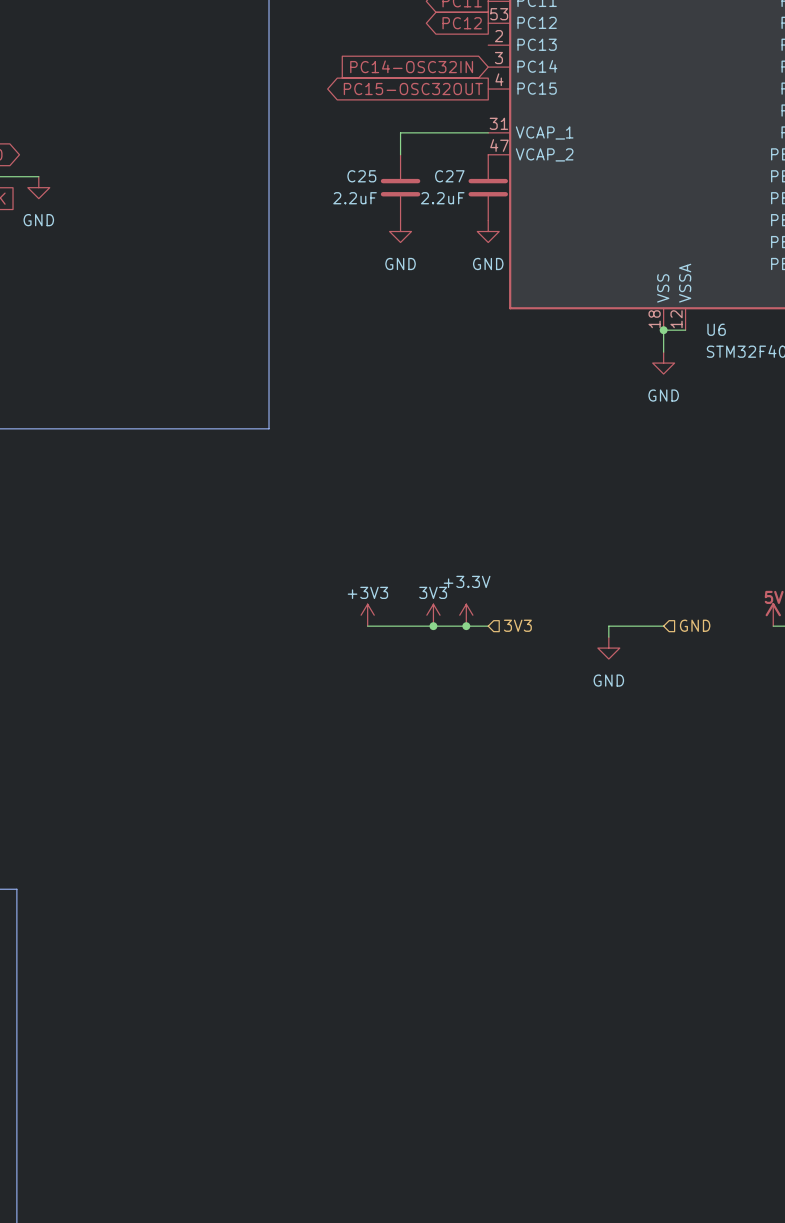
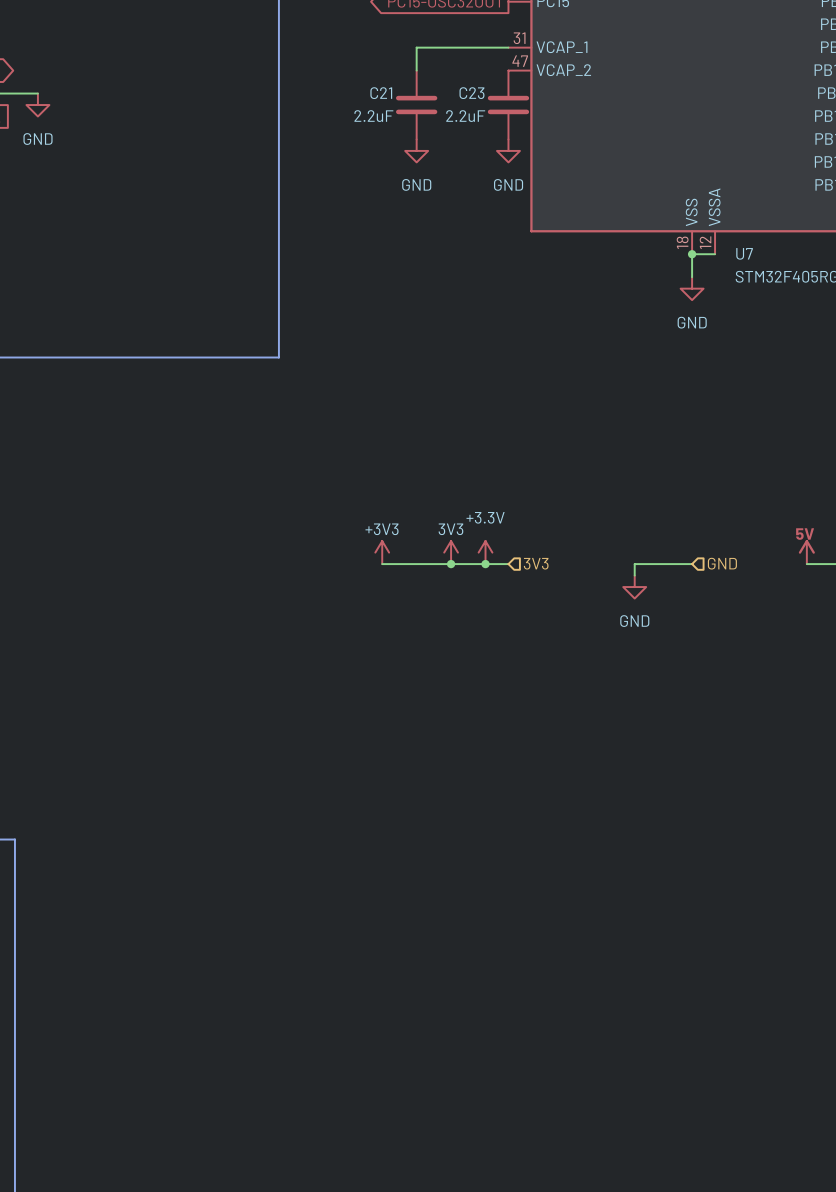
C25 name: C25 (361, 176) -> C21 (381, 93)
C27 name: C27 (449, 176) -> C23 (471, 93)
U6 name: U6 (716, 329) -> U7 (744, 253)

